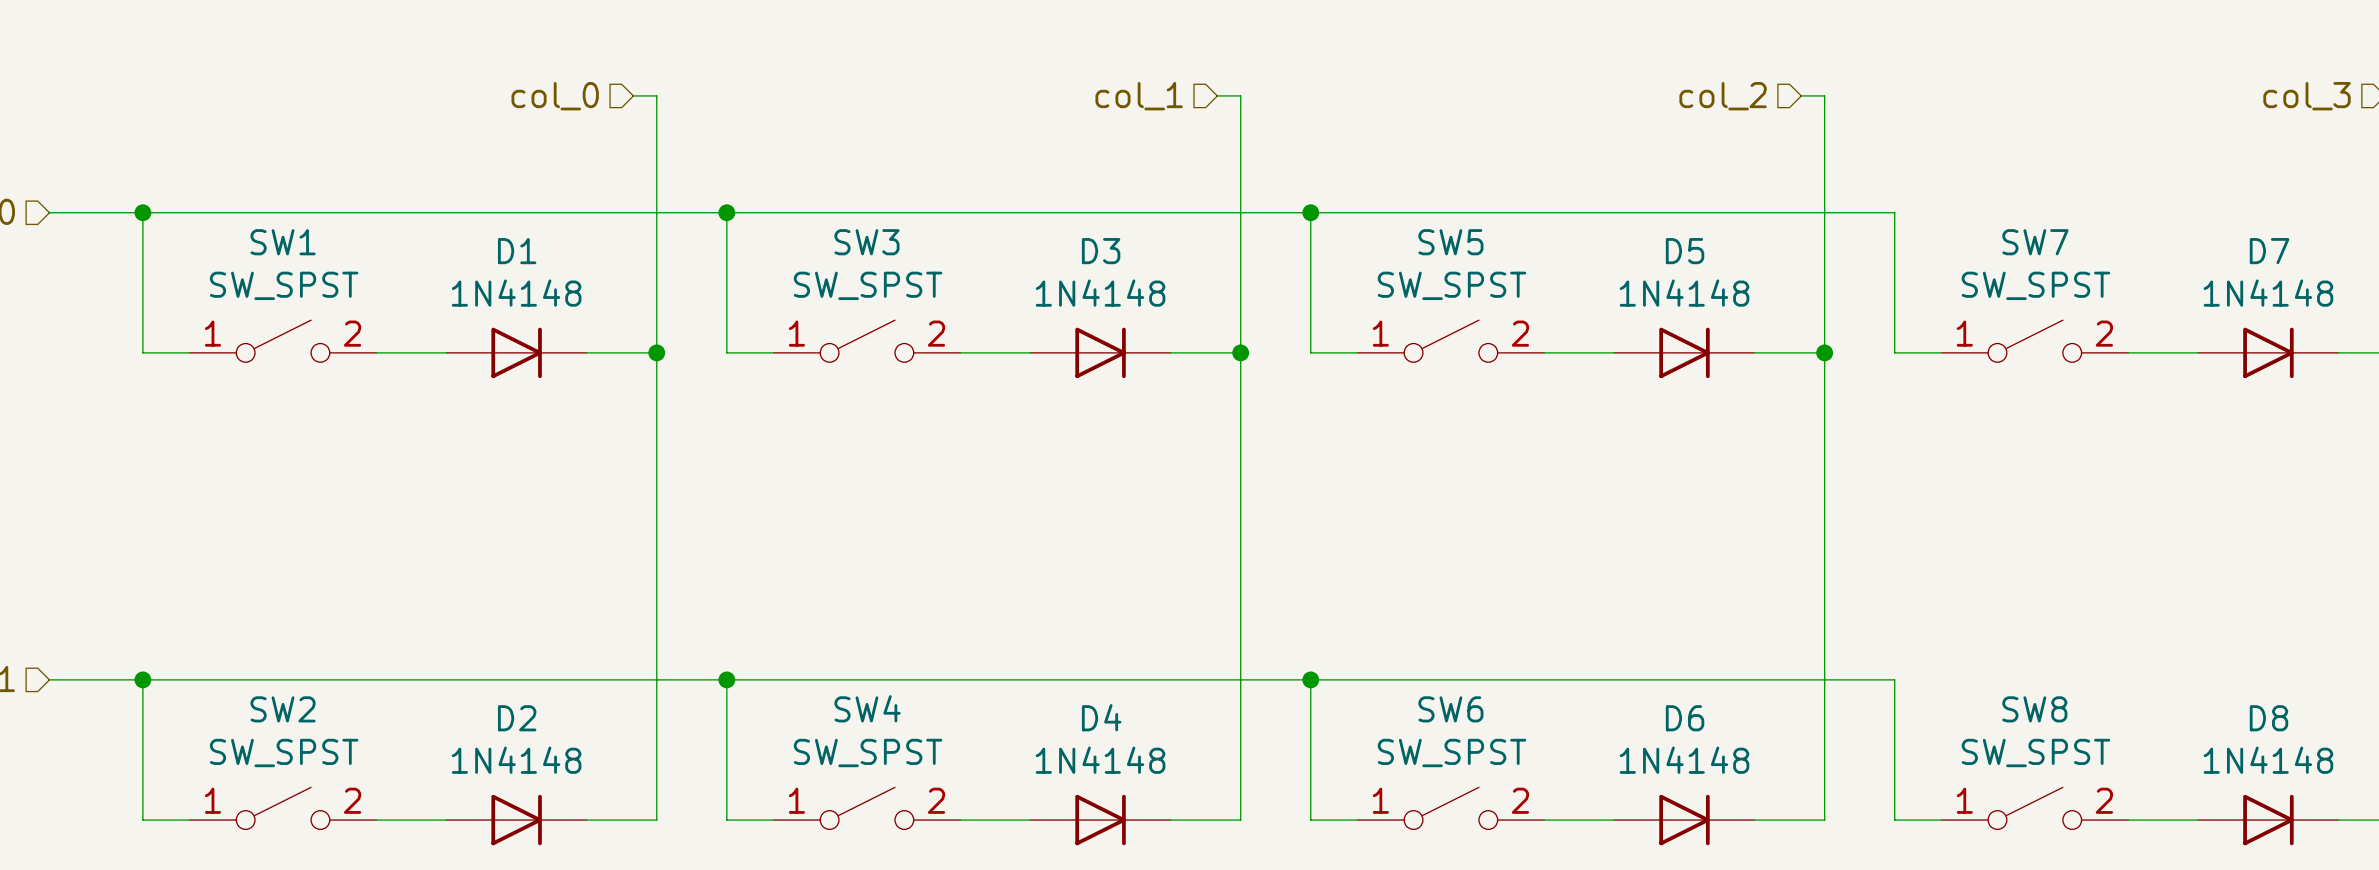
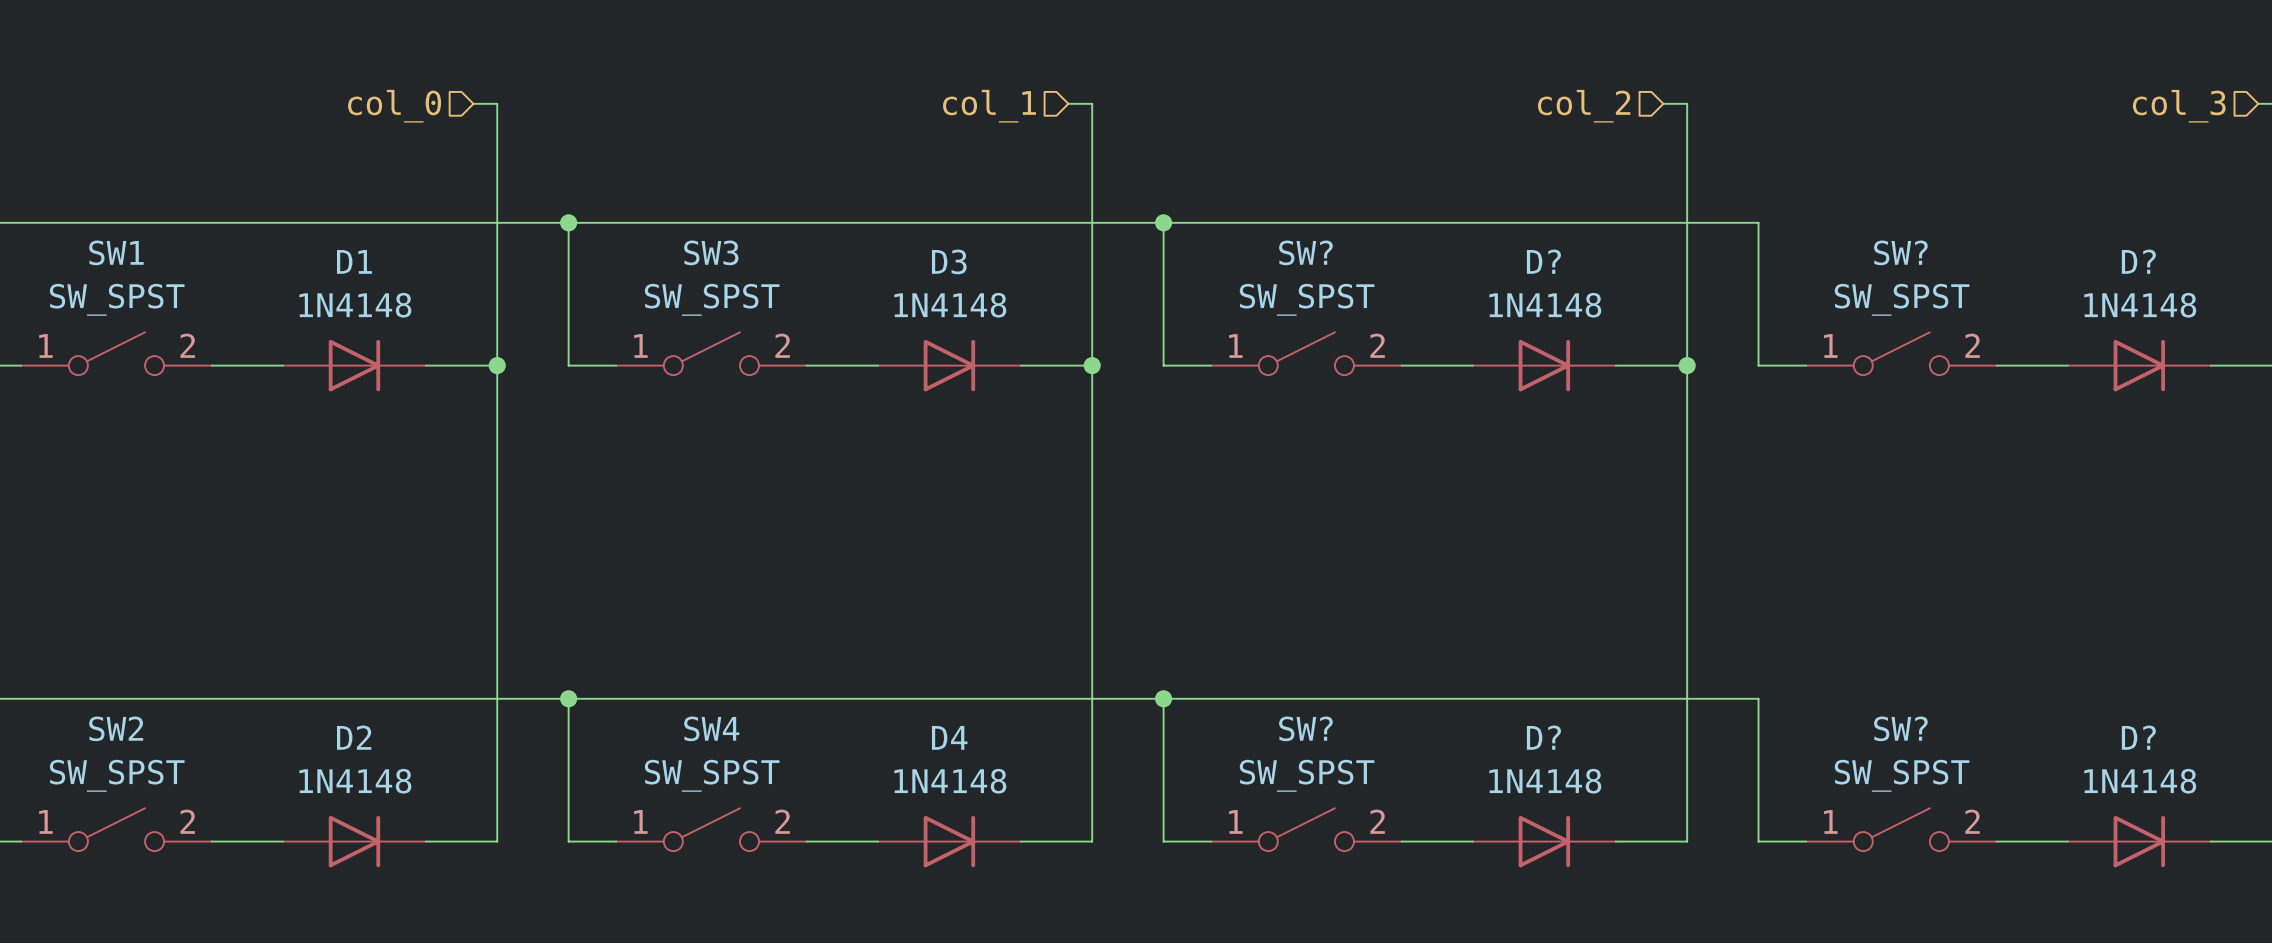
SW5 name: SW5 (1450, 242) -> SW? (1305, 252)
SW7 name: SW7 (2035, 242) -> SW? (1900, 252)
D5 name: D5 (1685, 251) -> D? (1543, 261)
D7 name: D7 (2269, 251) -> D? (2138, 261)
SW6 name: SW6 (1450, 709) -> SW? (1305, 728)
SW8 name: SW8 (2034, 709) -> SW? (1900, 728)
D6 name: D6 (1685, 718) -> D? (1543, 737)
D8 name: D8 (2268, 718) -> D? (2138, 737)

